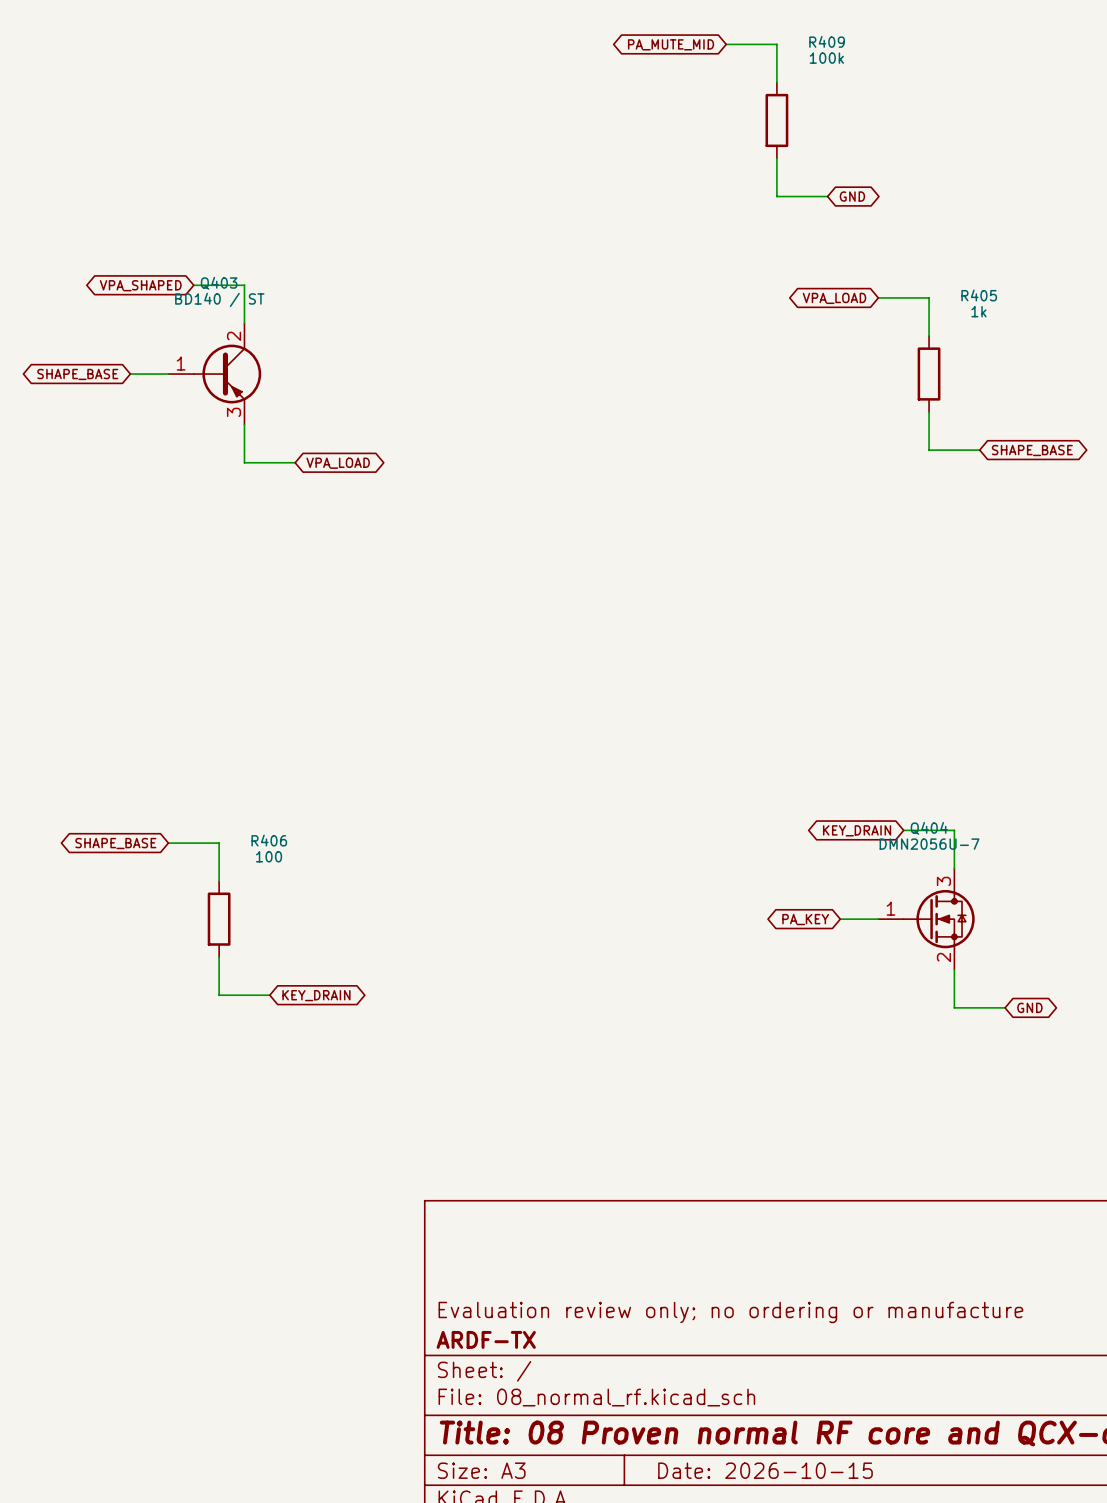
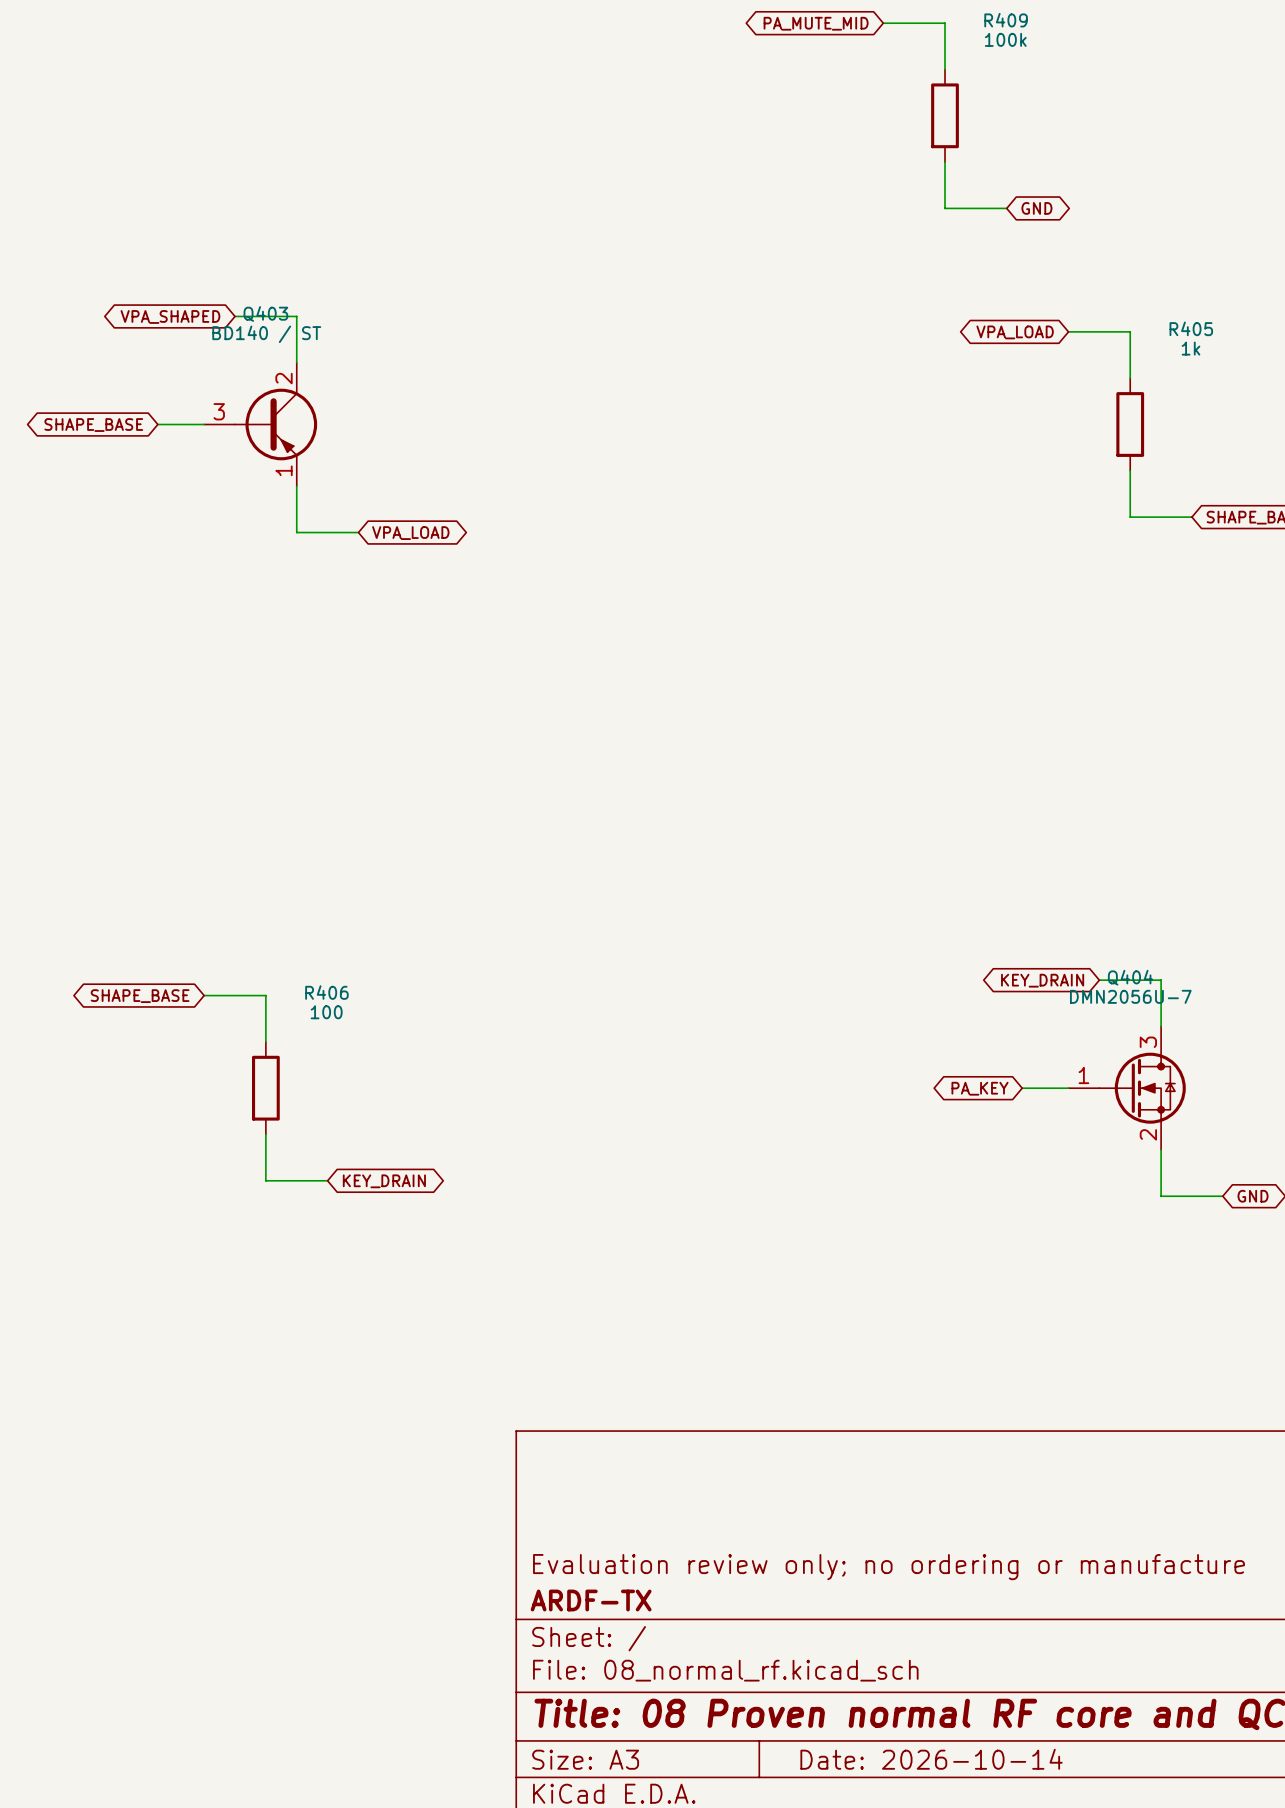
Q403 pin number: 1 (181, 363) -> 3 (219, 411)
Q403 pin number: 3 (234, 412) -> 1 (284, 470)
title block: Date: 2026-10-15 (765, 1470) -> Date: 2026-10-14 (931, 1759)

